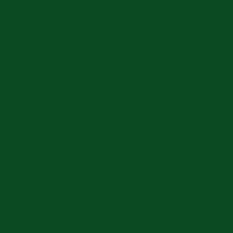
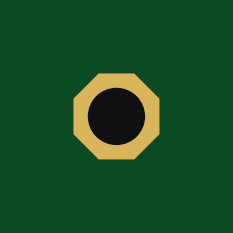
part: none -> (116, 116)

